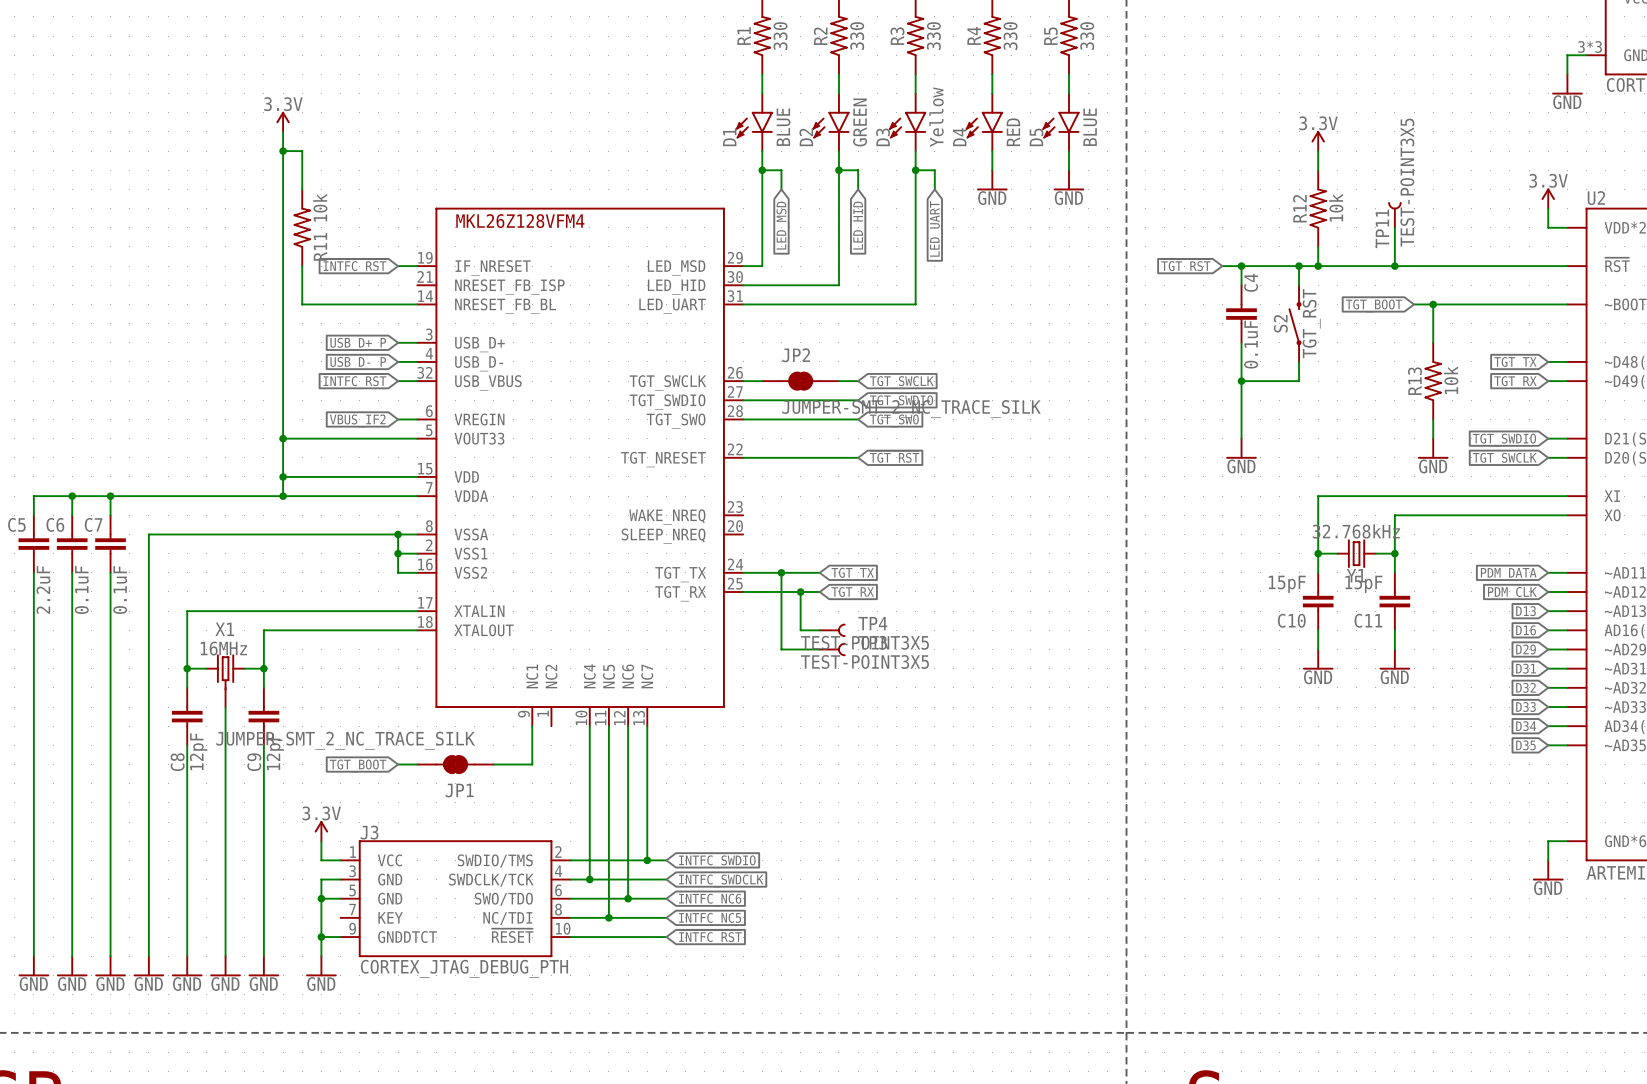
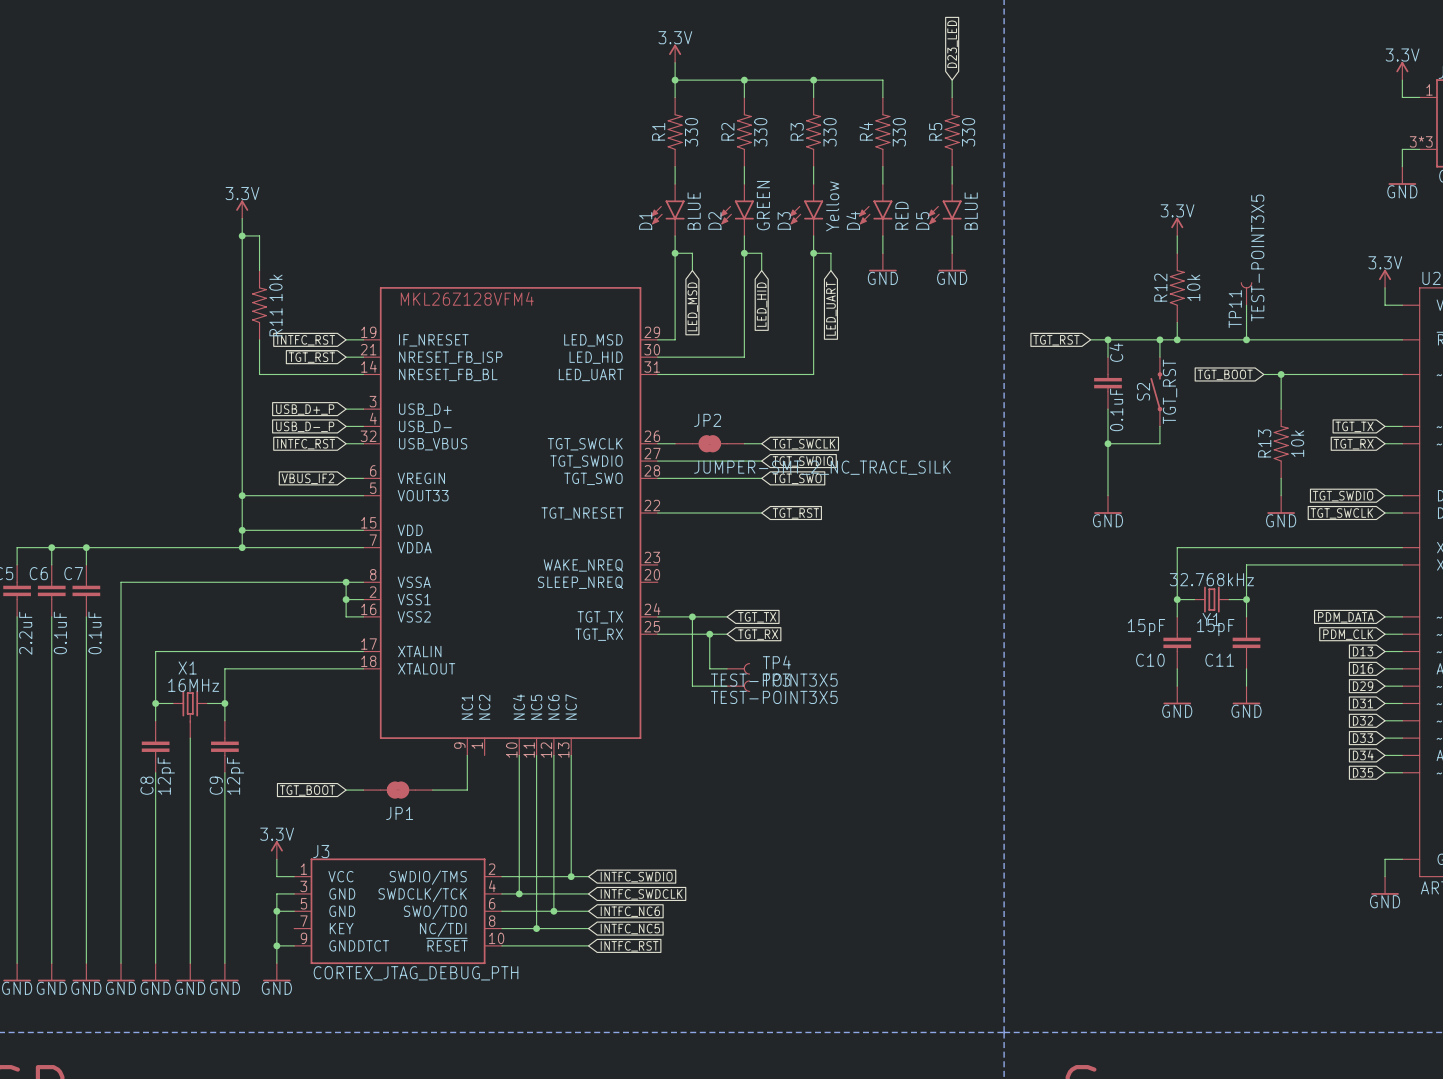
global label: none -> ~{TGT_RST} (311, 356)
wire: none -> (346, 357) (363, 357)
JP1 value: JUMPER-SMT_2_NC_TRACE_SILK (345, 740) -> none

